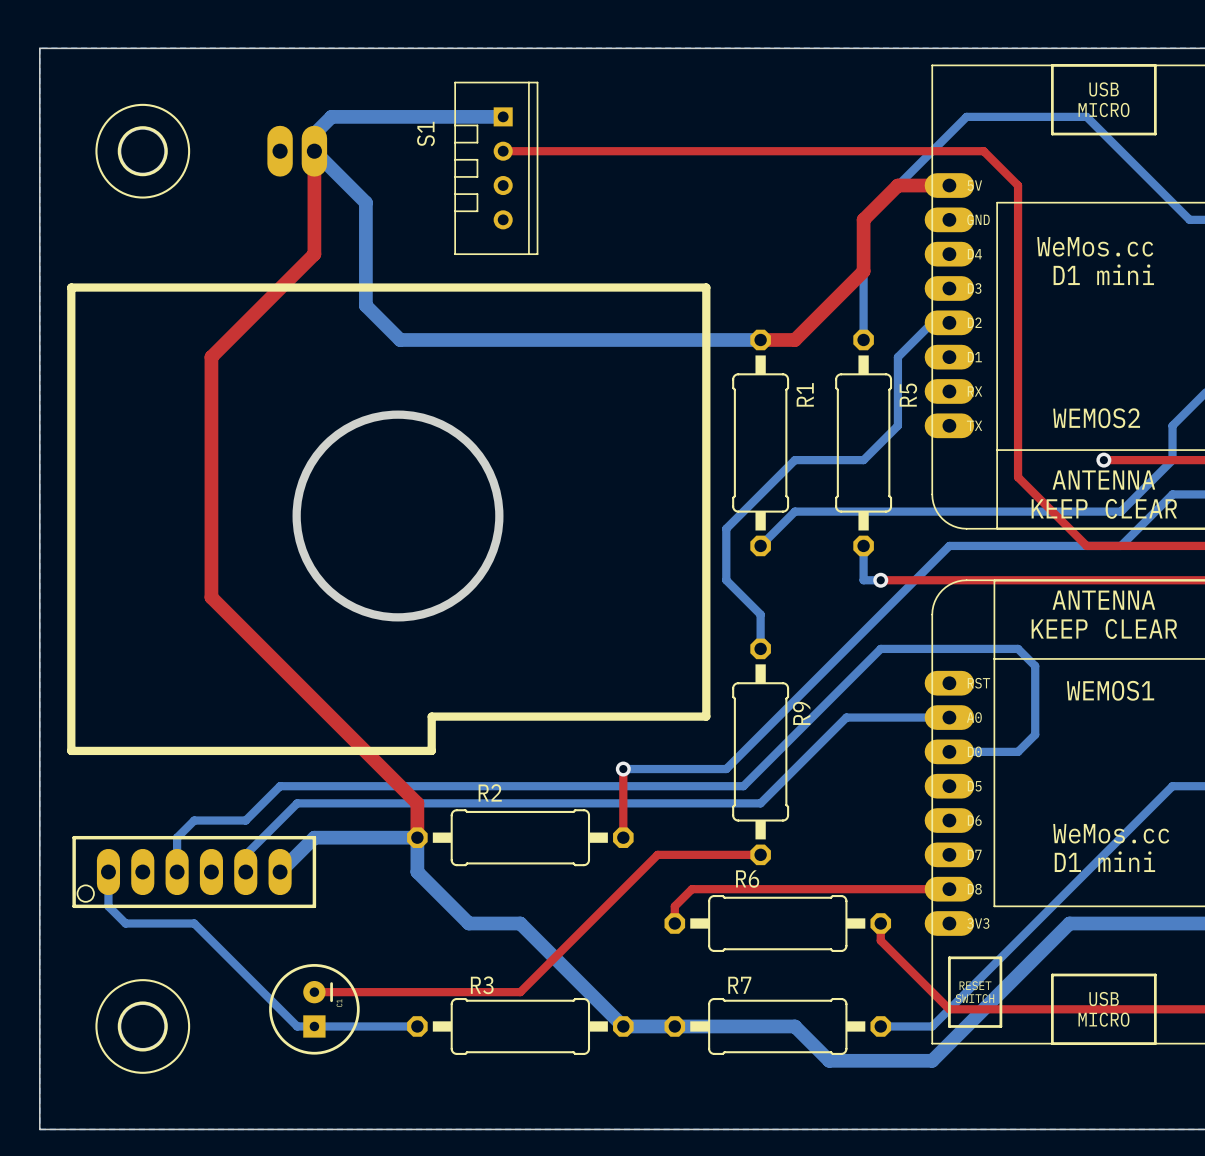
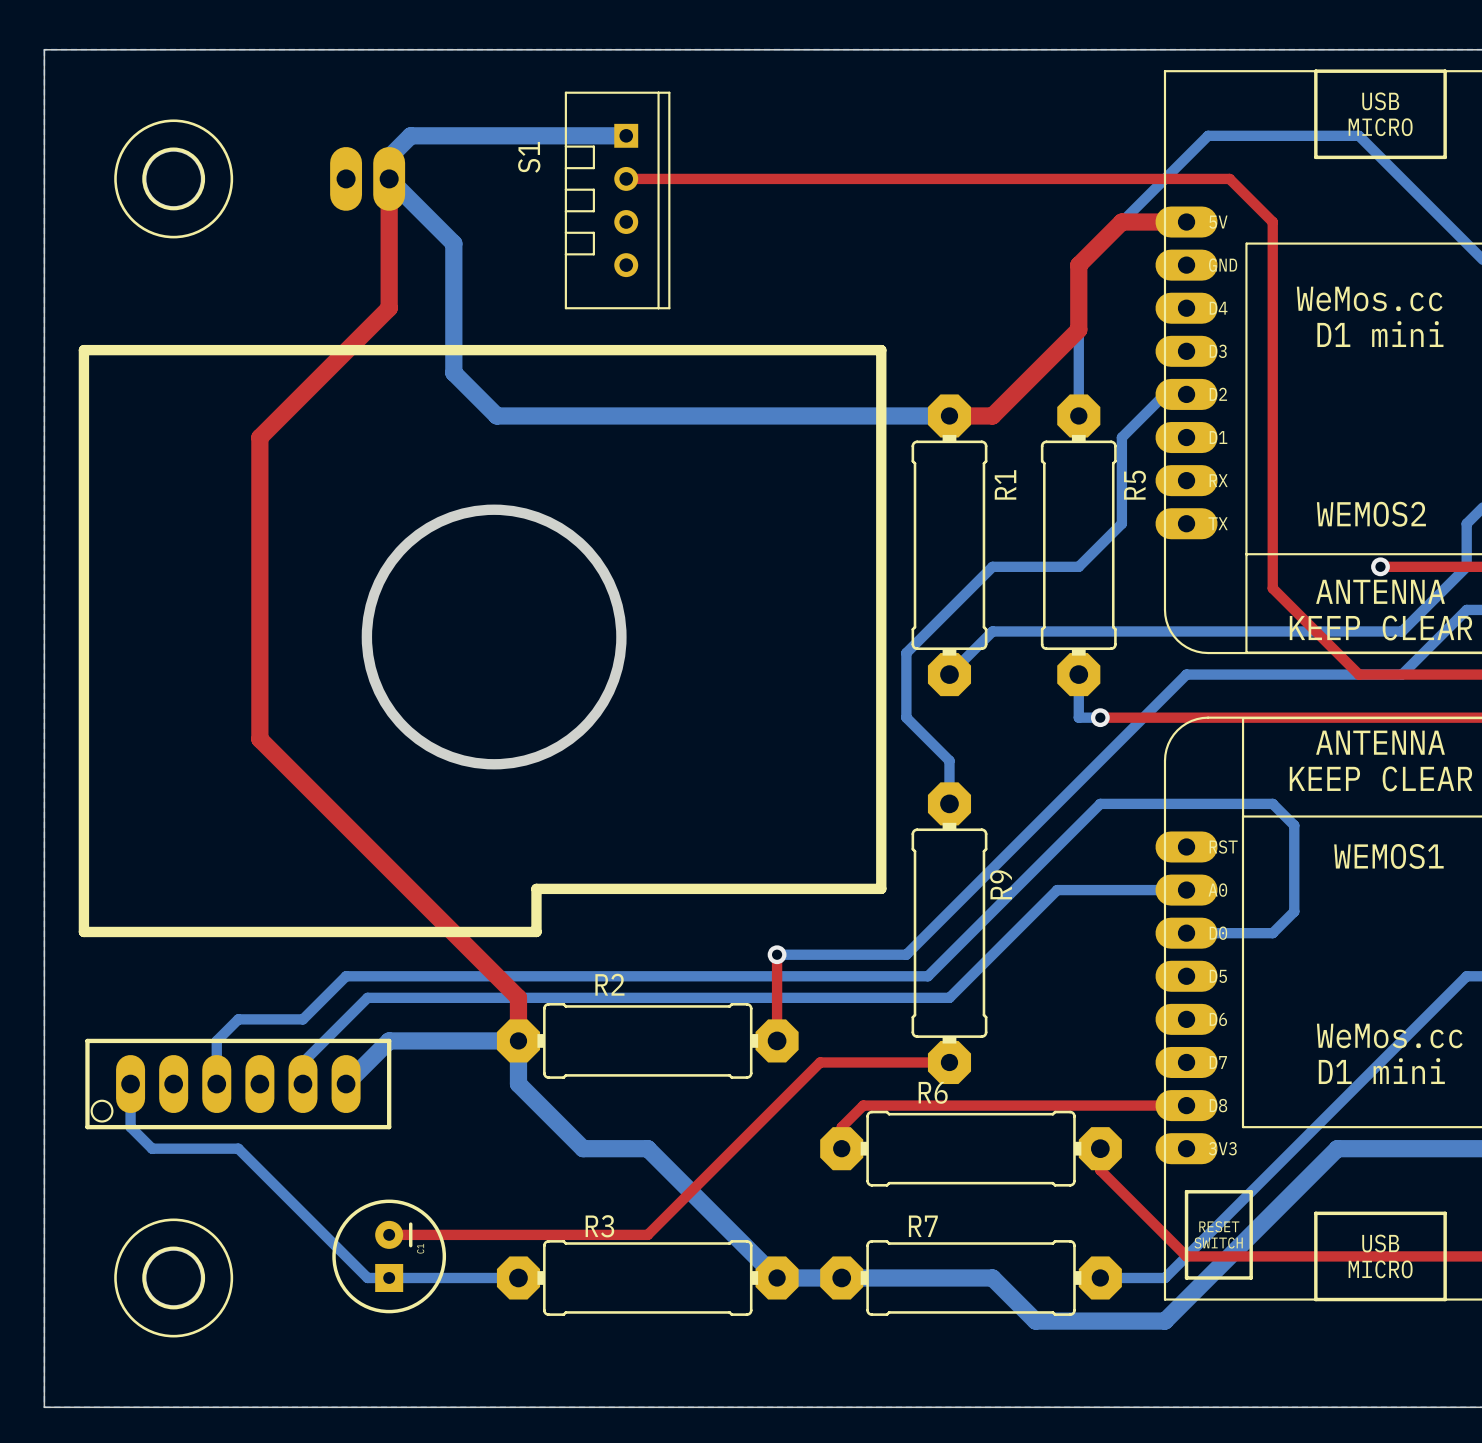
R1 footprint: [732, 329, 790, 557] -> [911, 394, 988, 697]
R5 footprint: [835, 329, 893, 557] -> [1040, 394, 1117, 697]
R9 footprint: [732, 638, 790, 866] -> [911, 782, 988, 1085]
R2 footprint: [407, 809, 634, 867] -> [496, 1003, 799, 1079]
R6 footprint: [664, 895, 892, 952] -> [820, 1110, 1122, 1187]
R3 footprint: [407, 997, 634, 1055] -> [496, 1240, 799, 1316]
R7 footprint: [664, 997, 892, 1055] -> [820, 1240, 1122, 1316]

